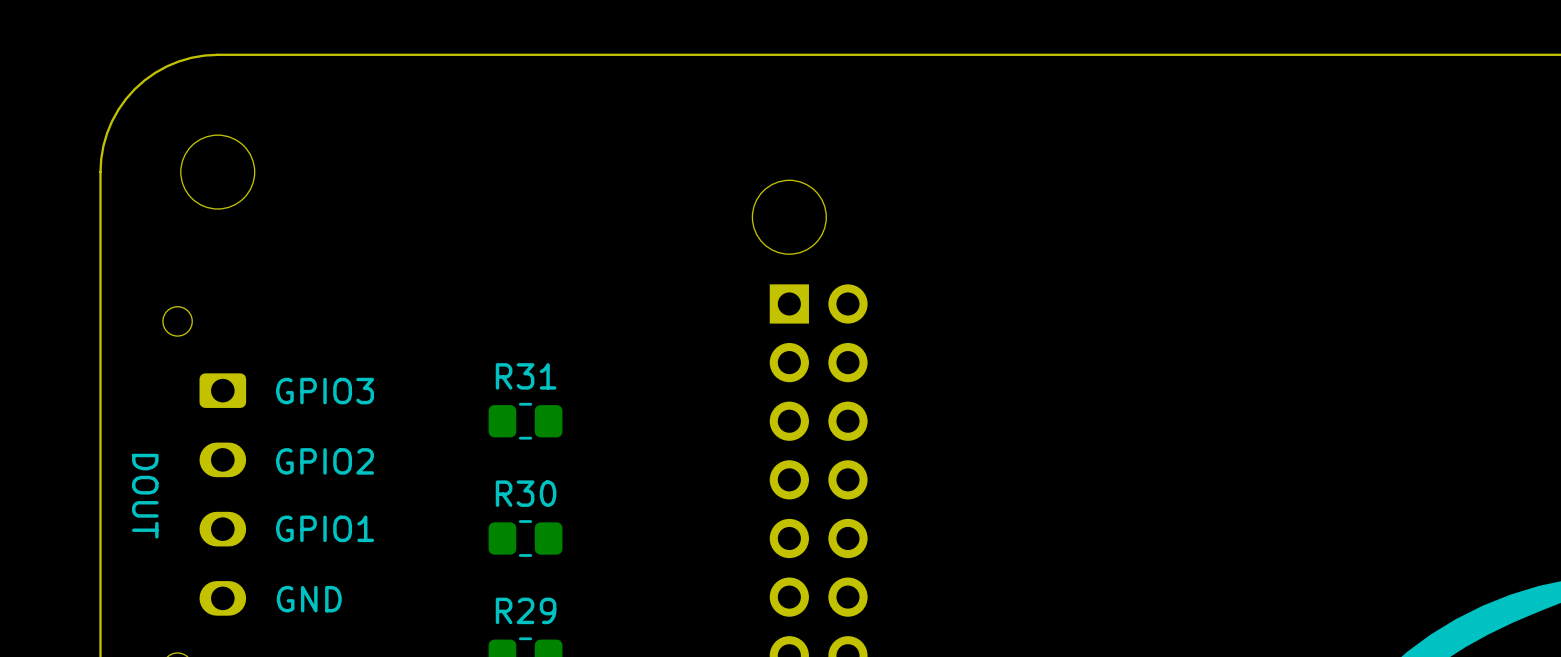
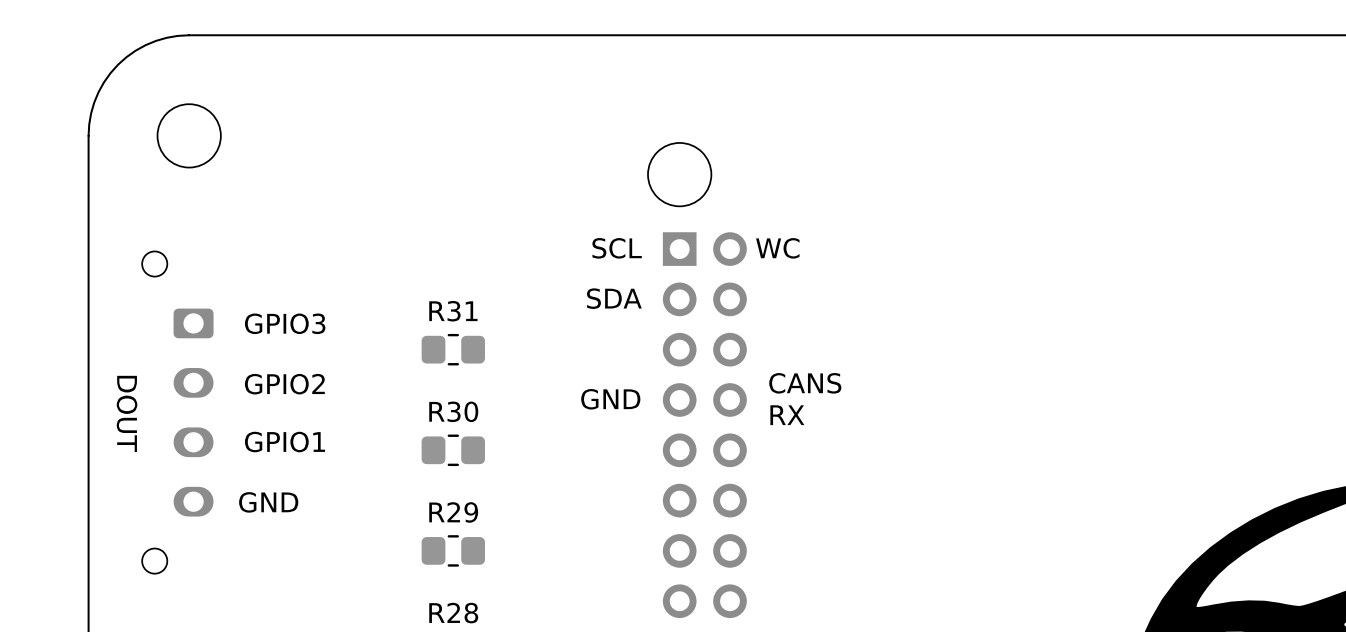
text: none -> SCL (617, 248)
text: none -> WC (777, 248)
text: none -> SDA (614, 298)
text: none -> CANS (805, 383)
text: none -> GND (610, 399)
text: none -> RX (787, 415)

